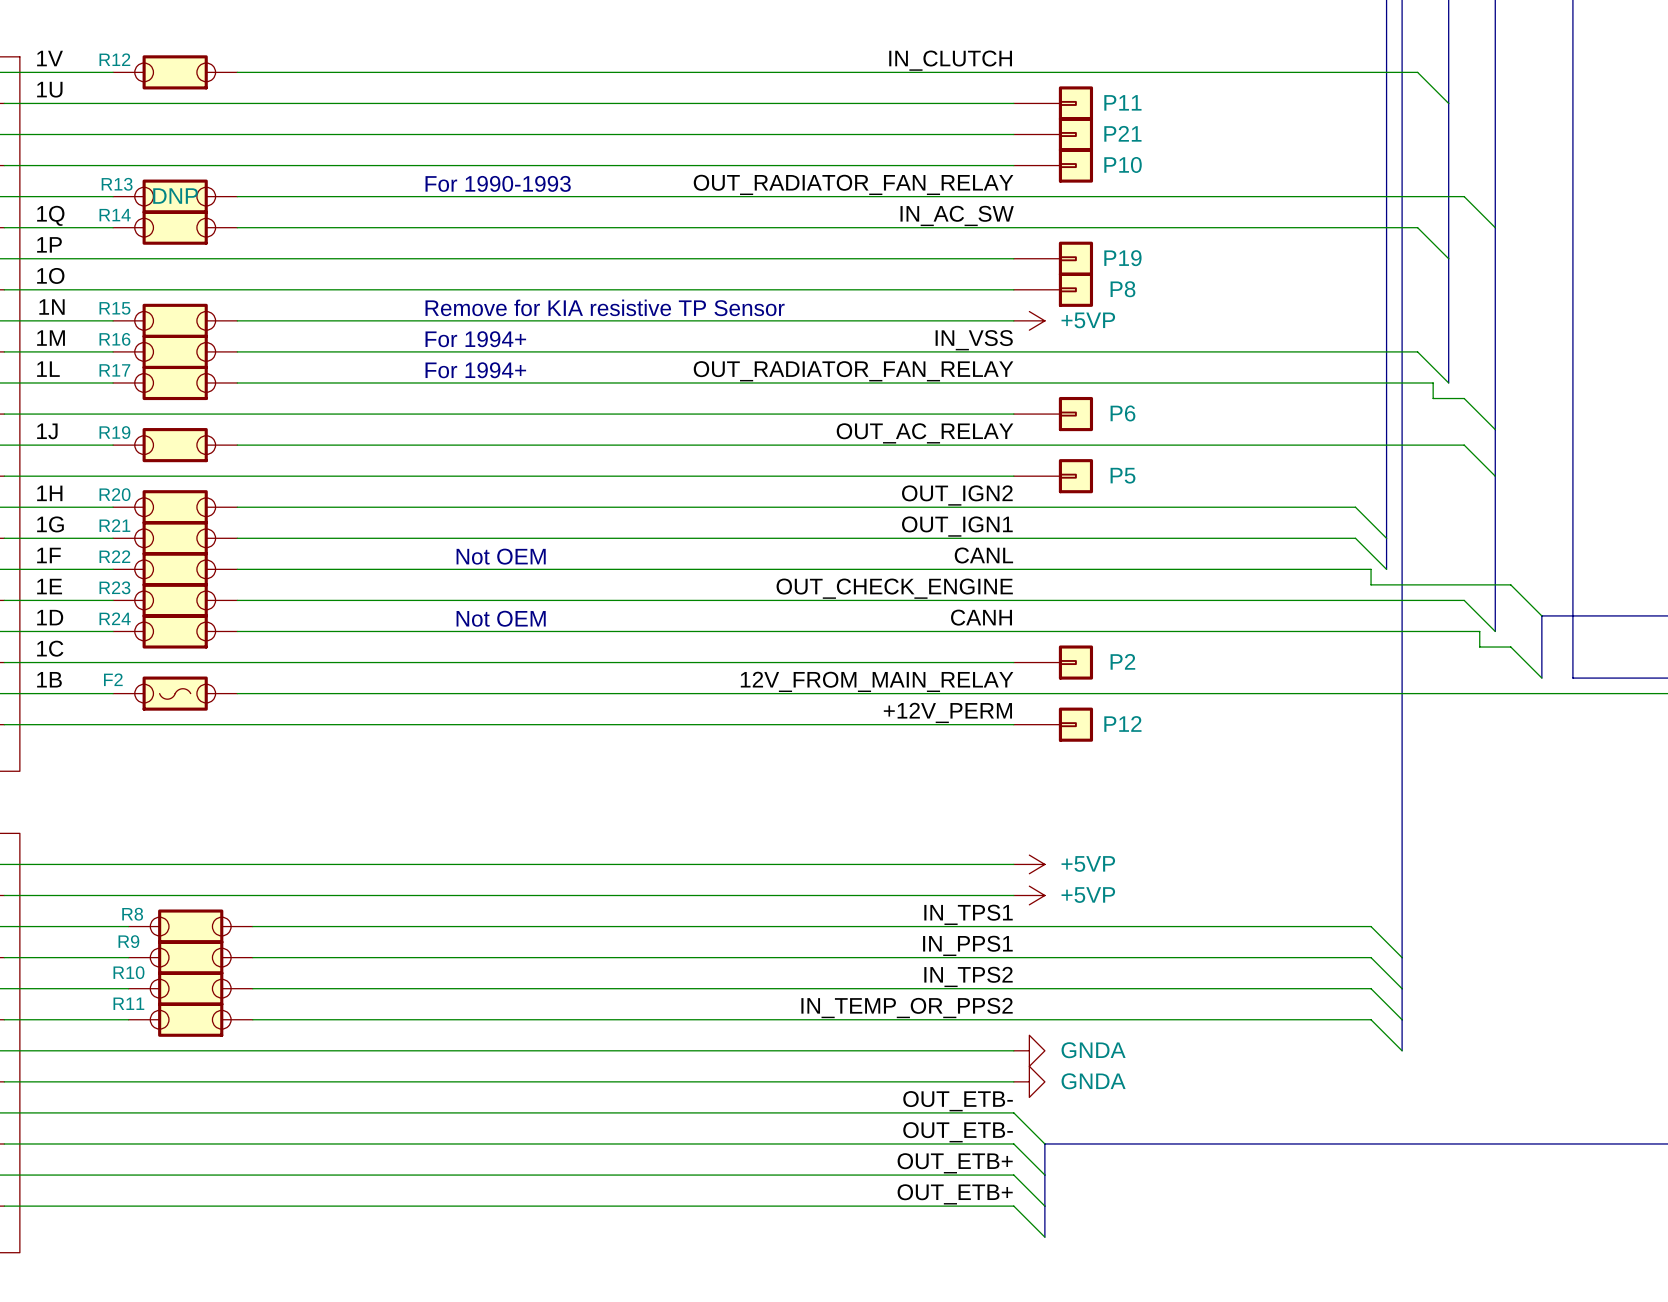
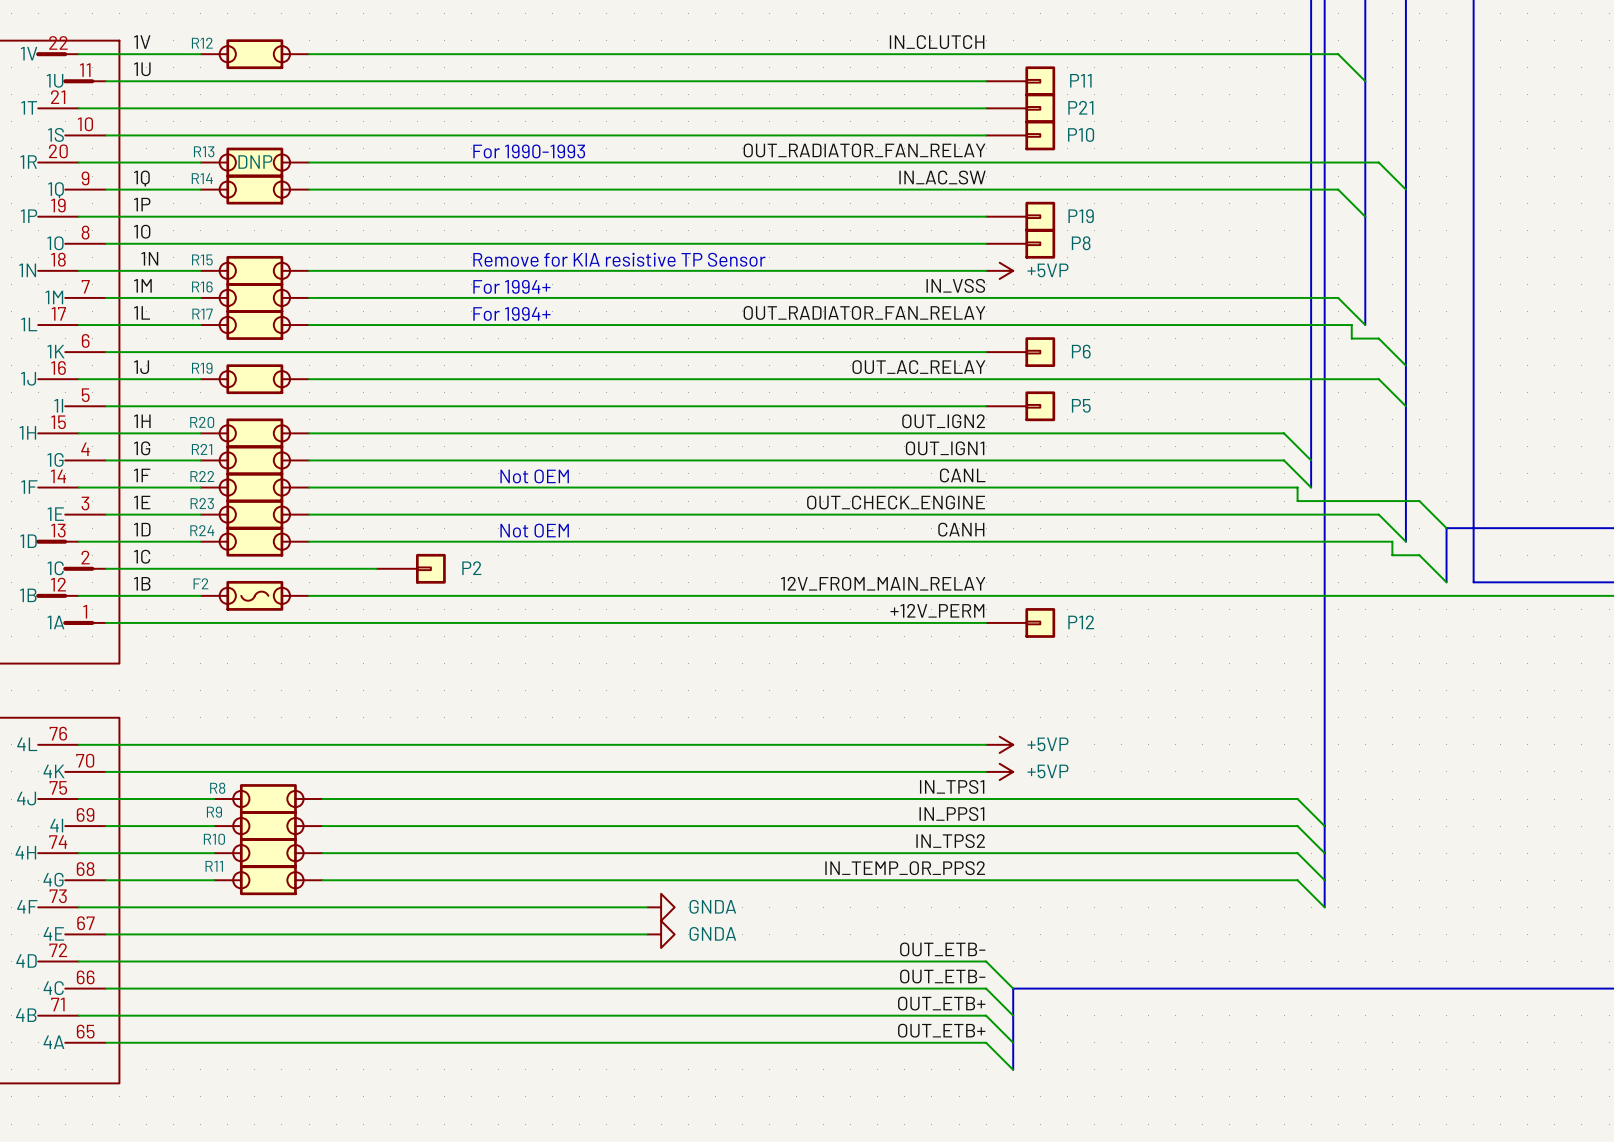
wire: (314, 662) (1013, 662) -> none
P2 position: (1053, 662) -> (411, 568)
wire: (625, 1050) (1013, 1050) -> none
power symbol: none -> GNDA (661, 907)
power symbol: GNDA (1029, 1050) -> none
wire: (625, 1081) (1013, 1081) -> none
power symbol: none -> GNDA (661, 934)
power symbol: GNDA (1029, 1081) -> none

